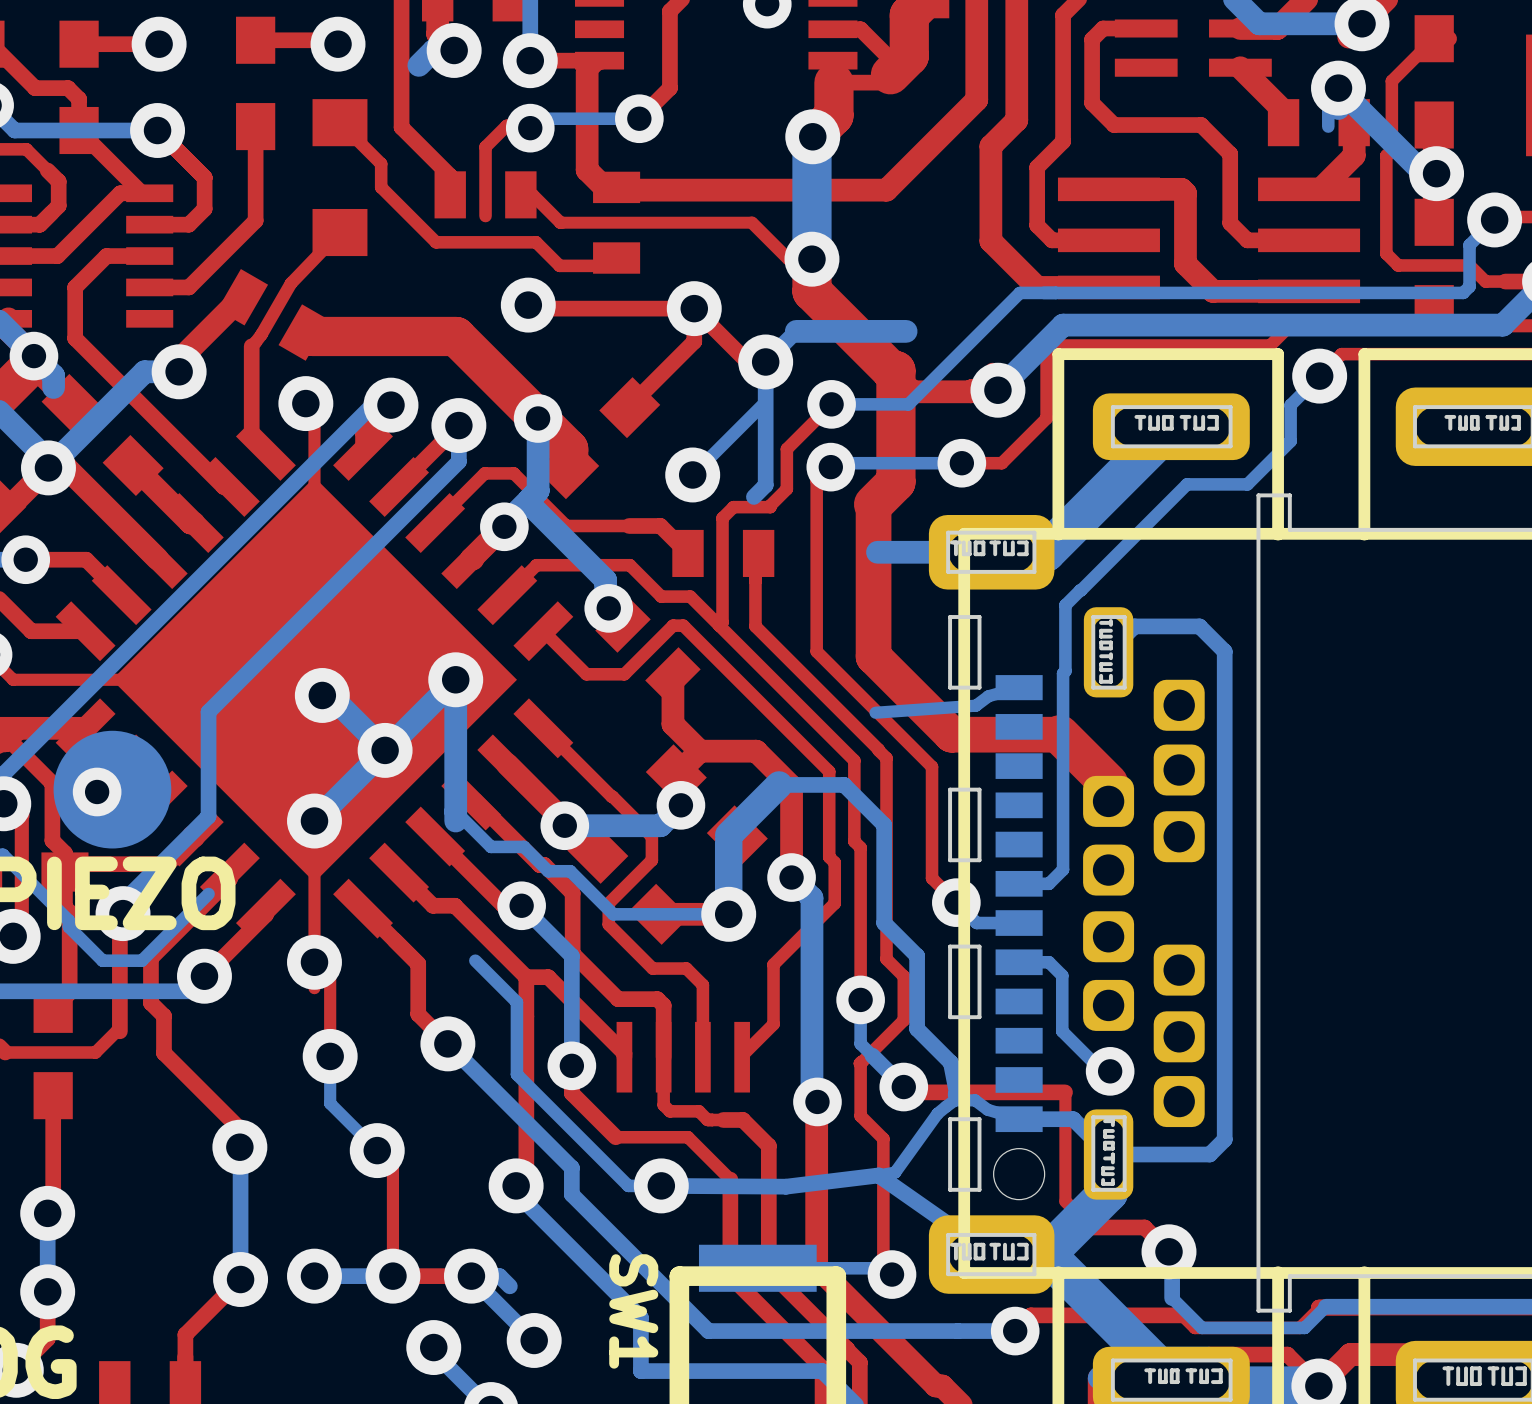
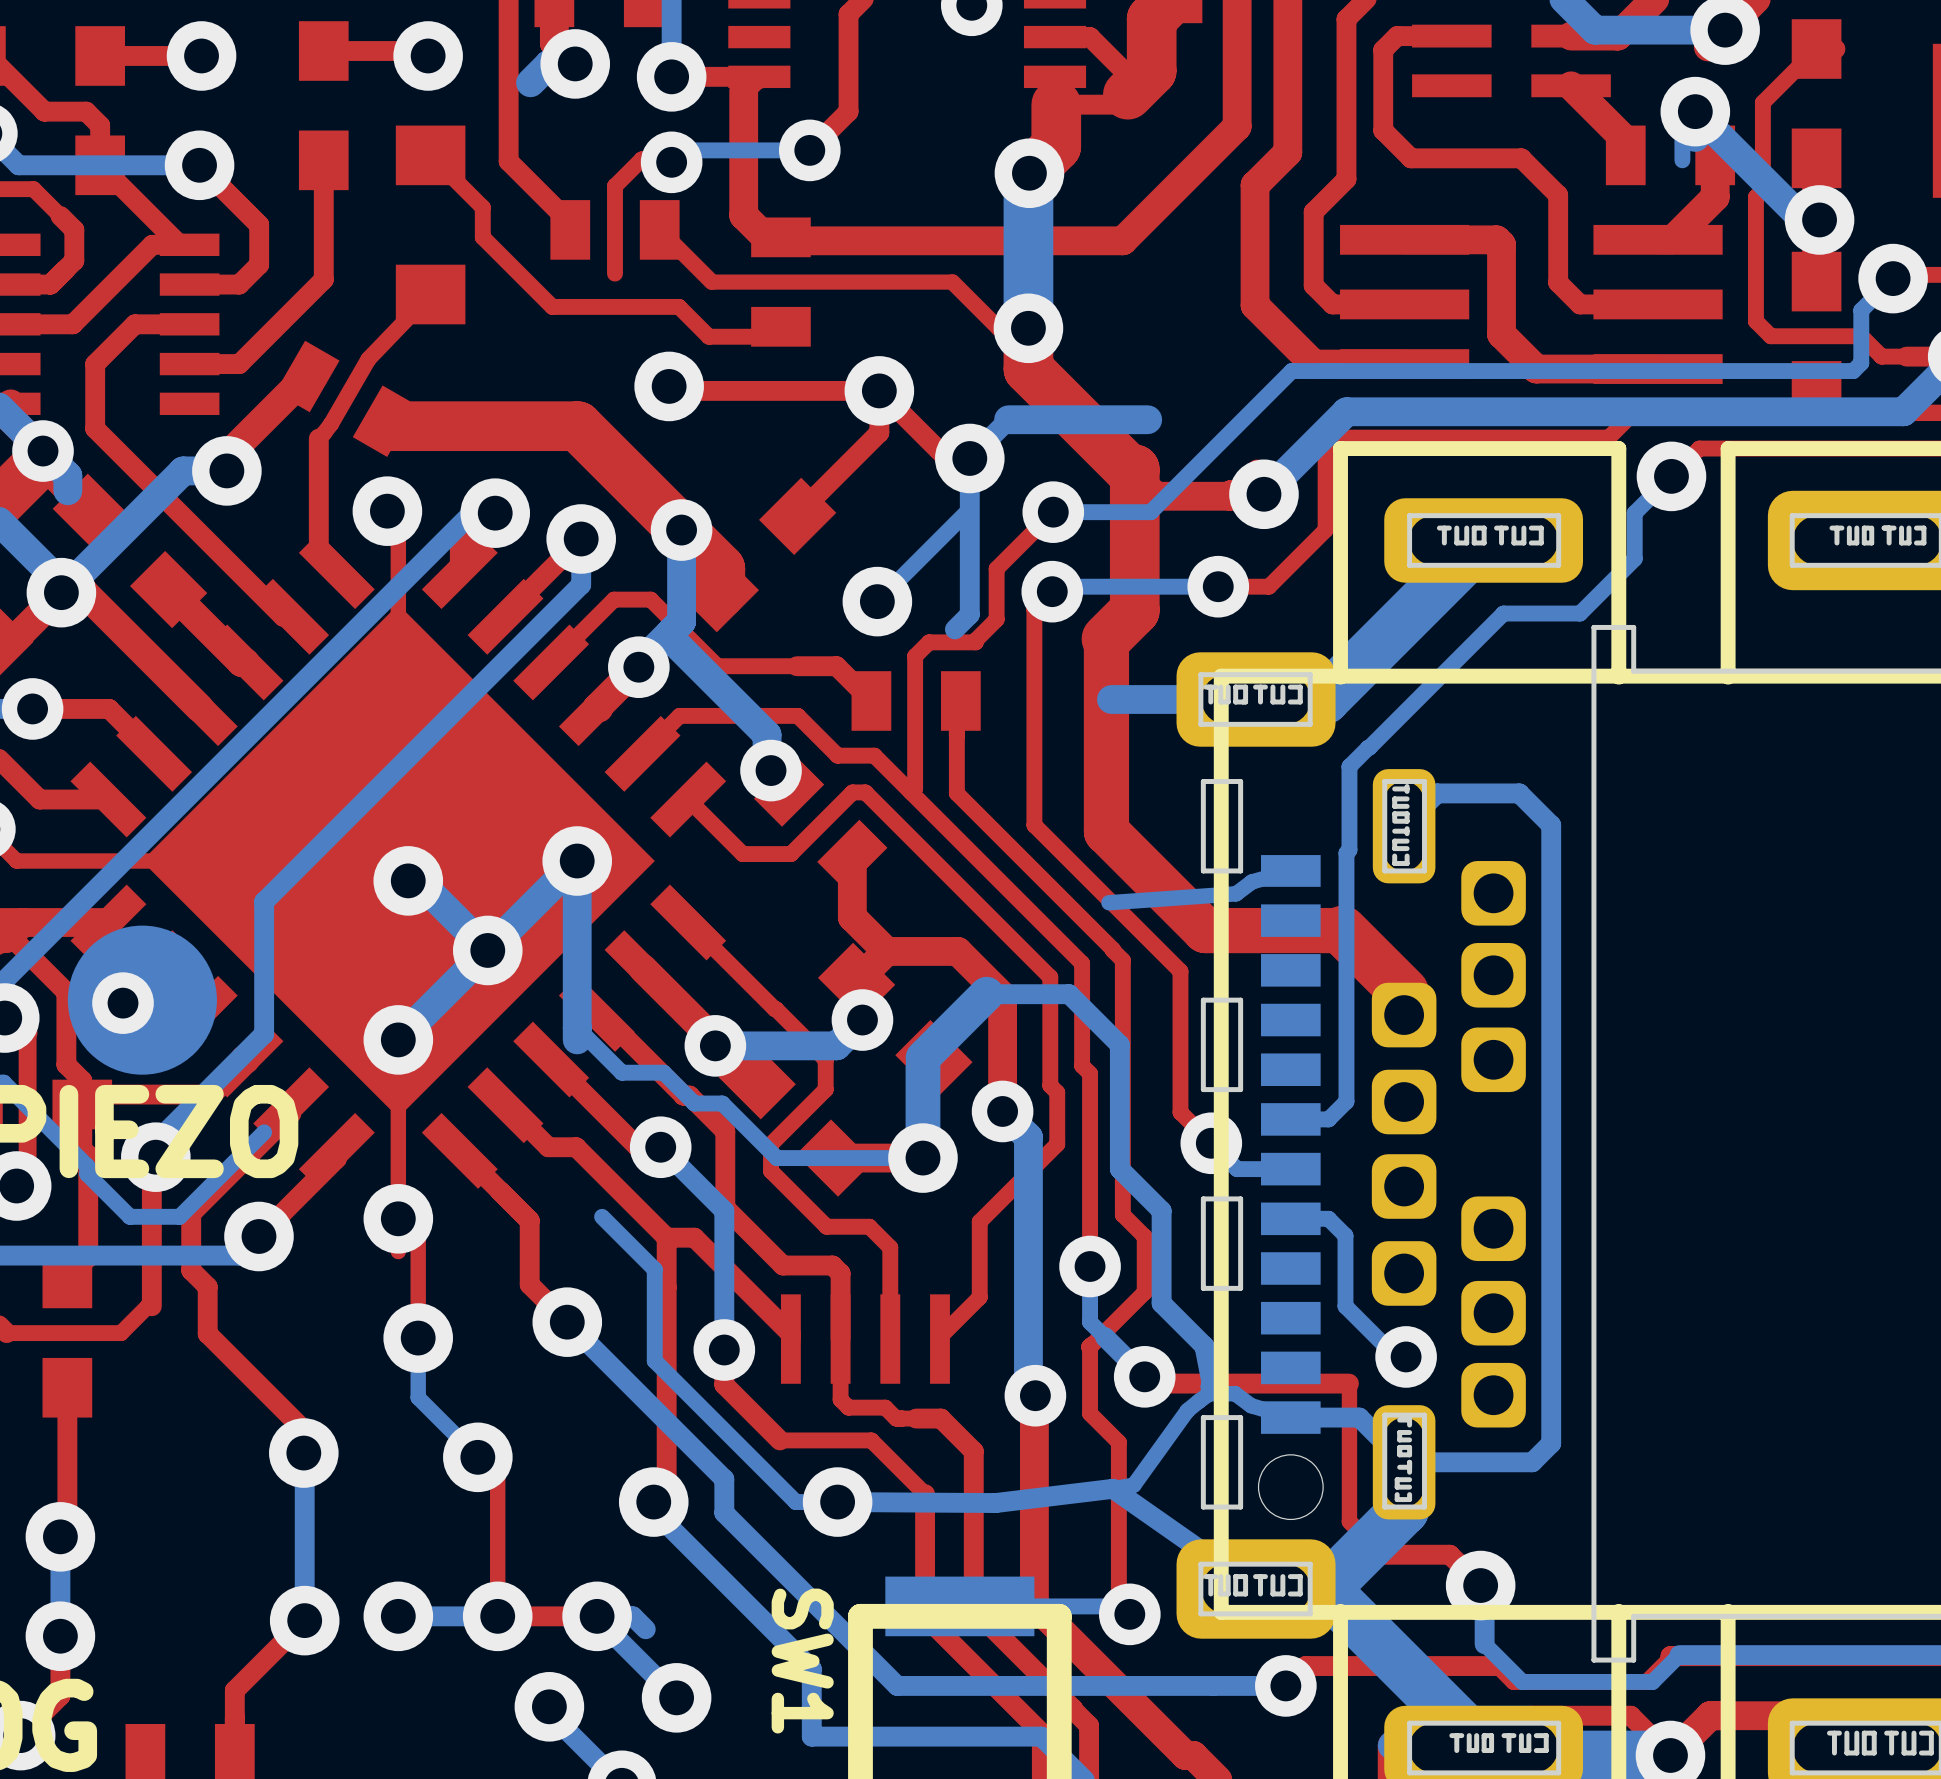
part position: (485, 194) -> (614, 229)
top track: (520, 194) (532, 194) (560, 222) -> (659, 229) (711, 282)

